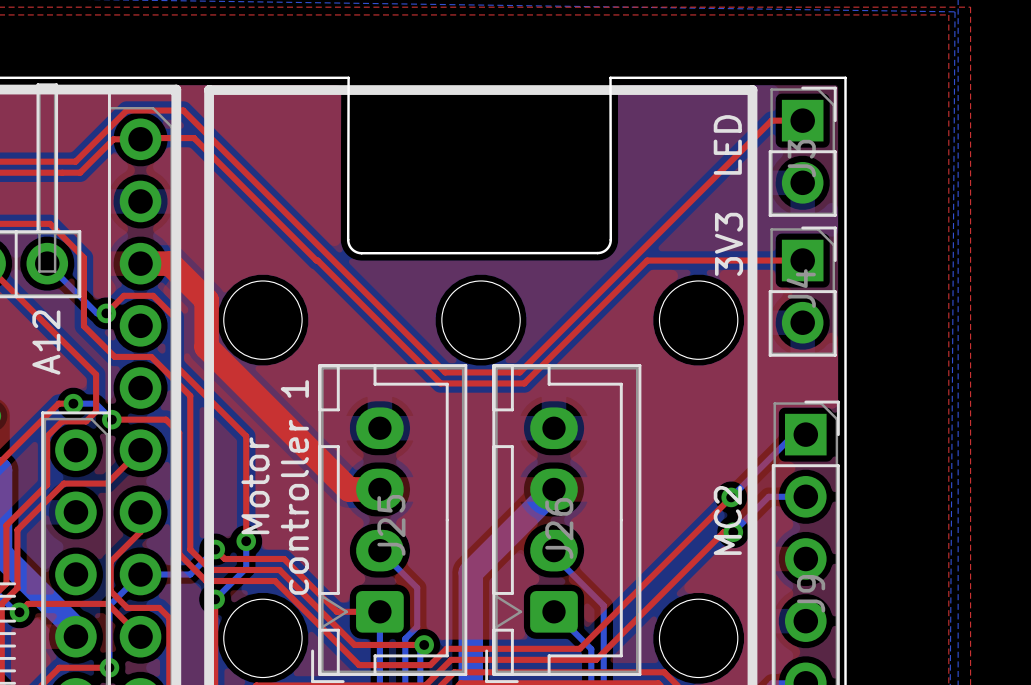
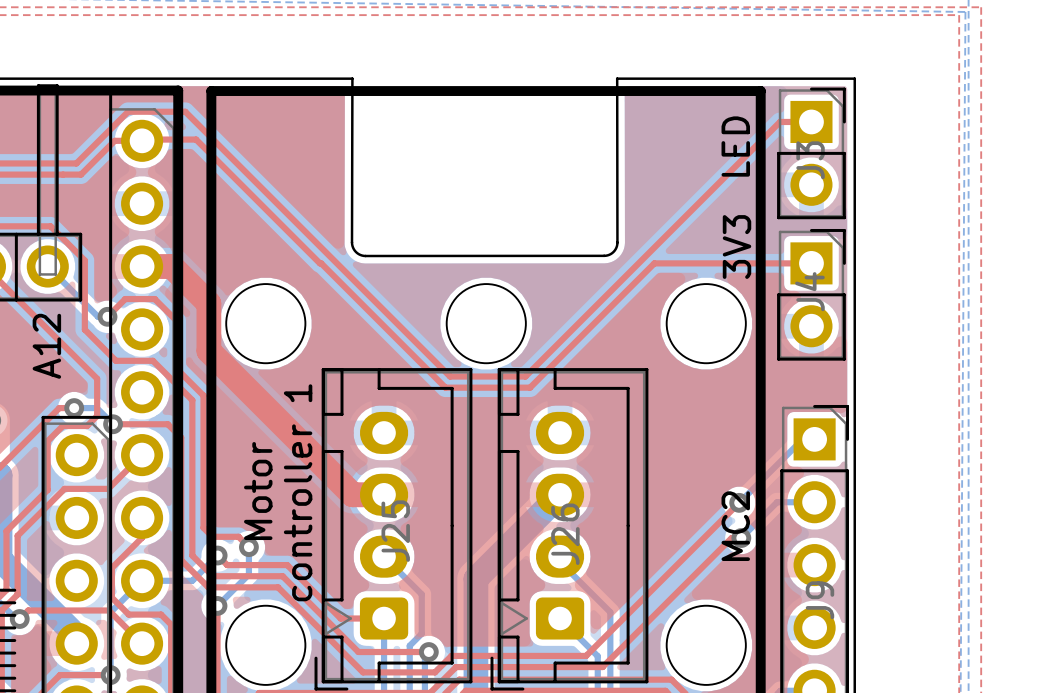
top track: (201, 391) (246, 436) (246, 541) -> (203, 395) (203, 527) (212, 536) (238, 536) (248, 547)

